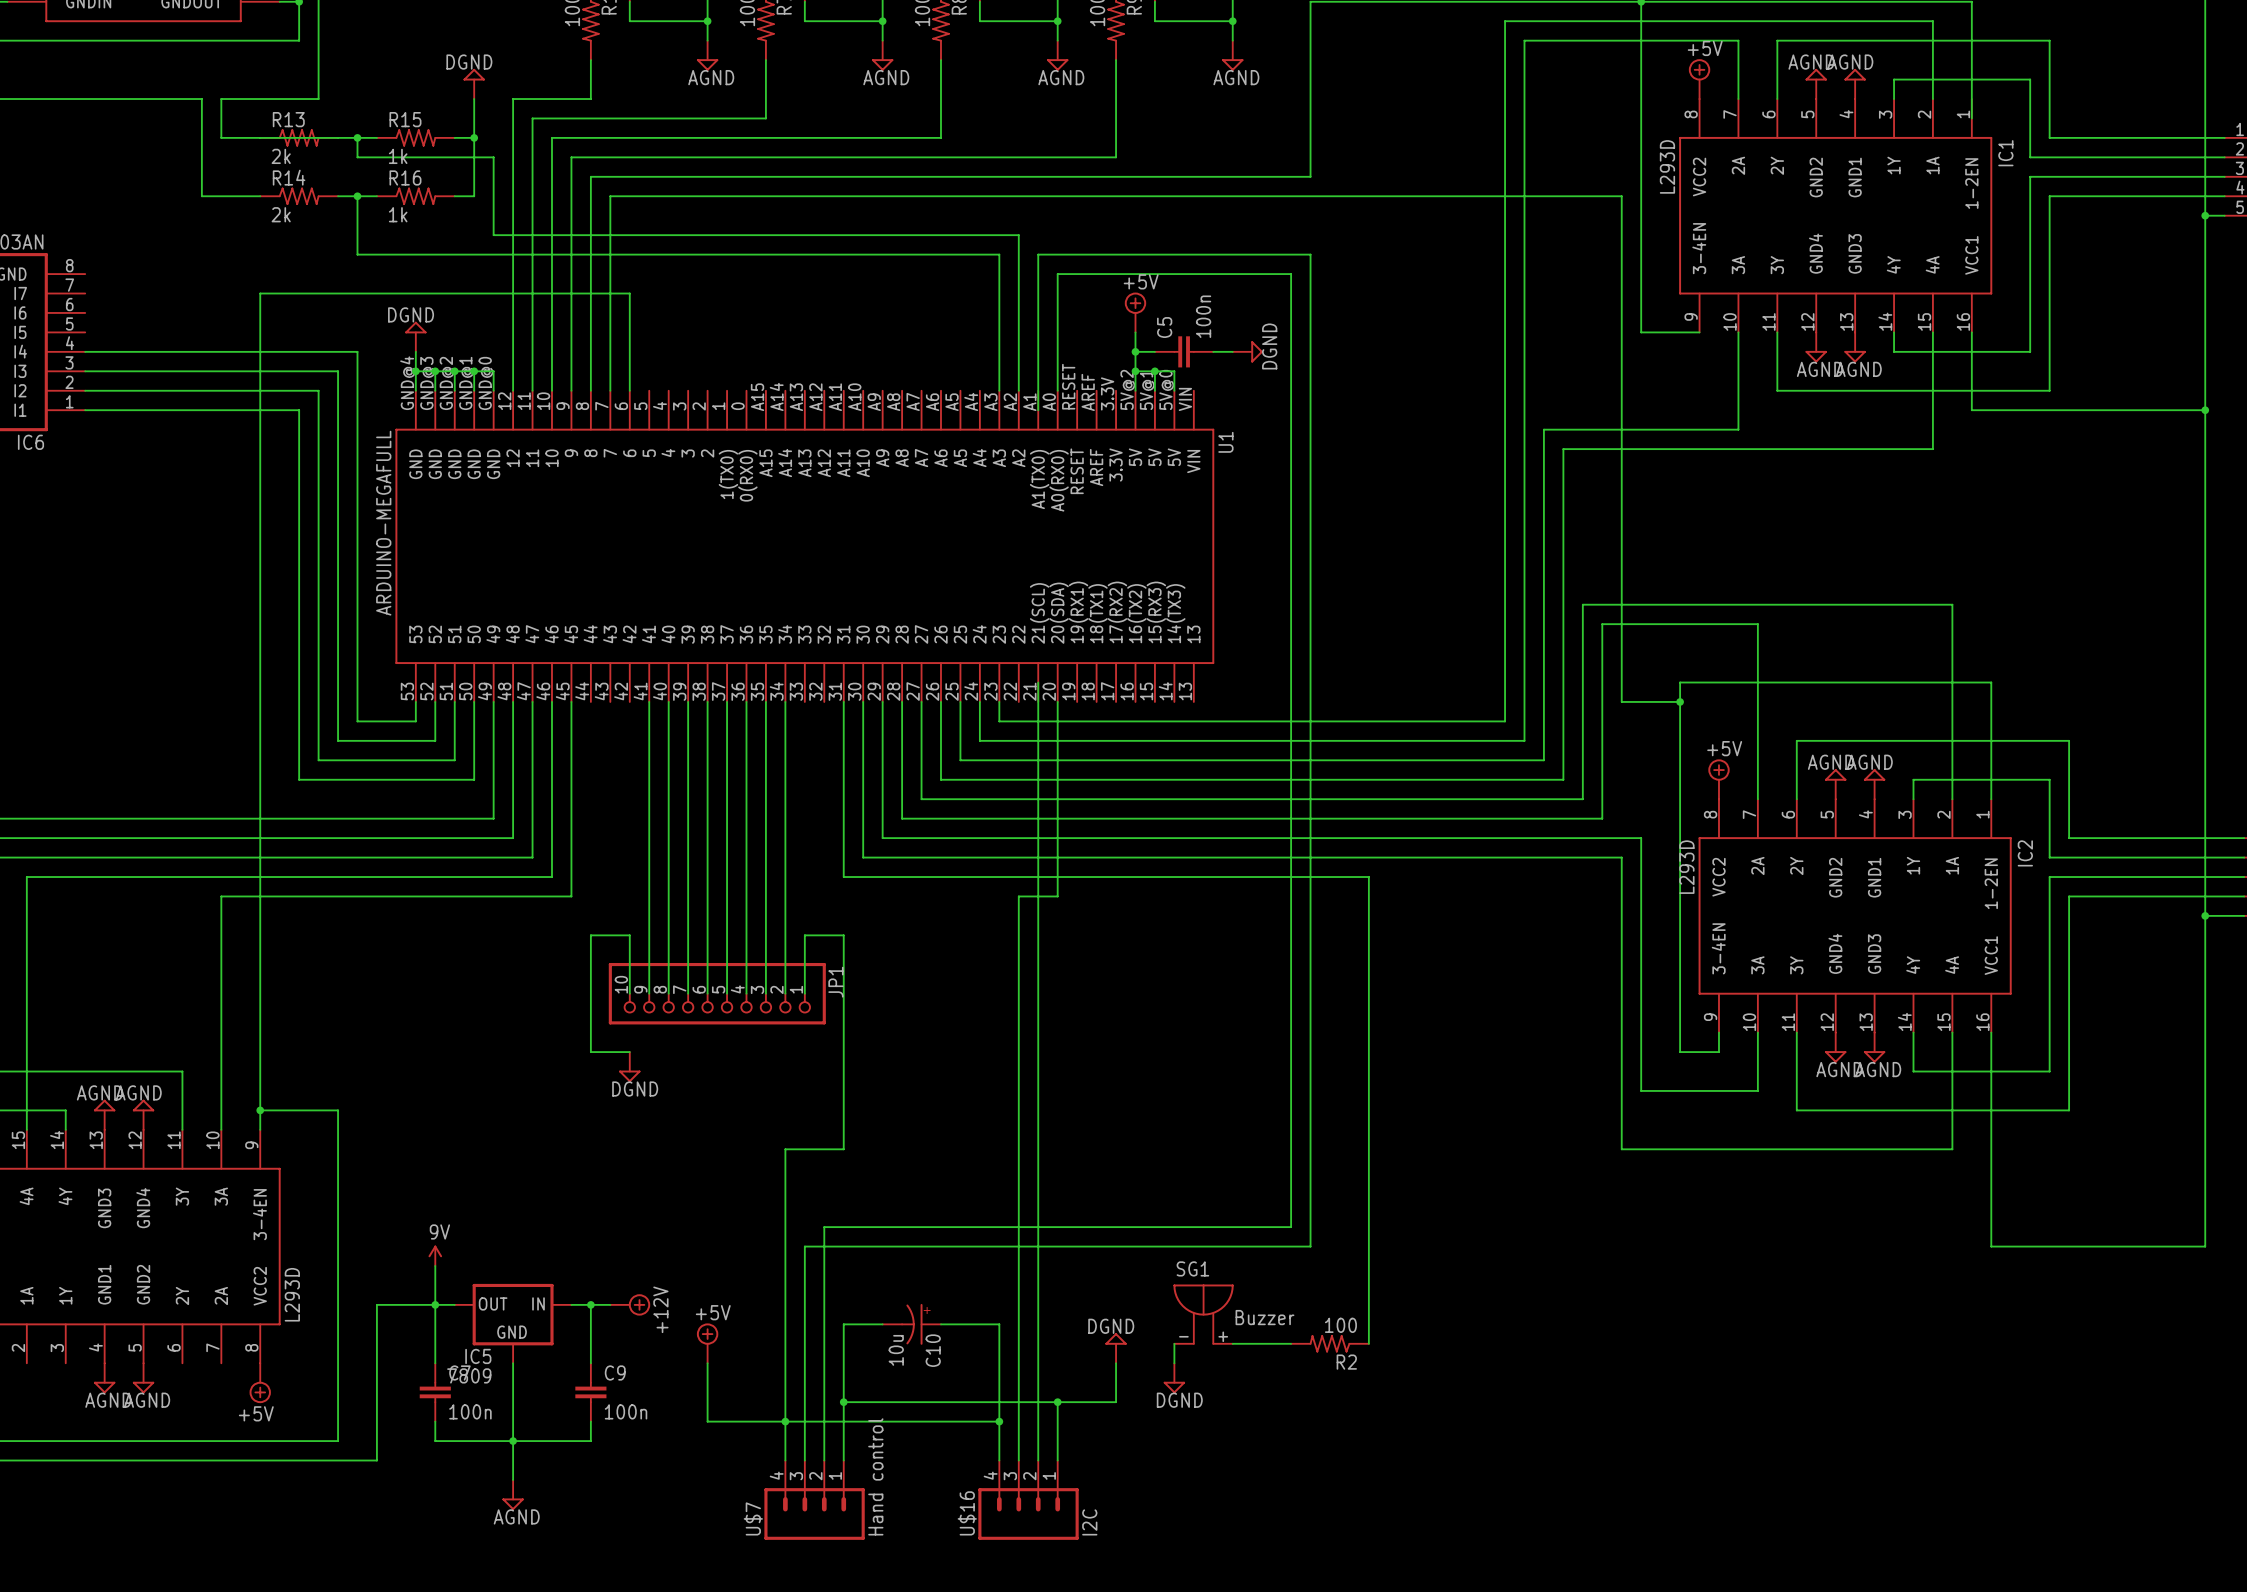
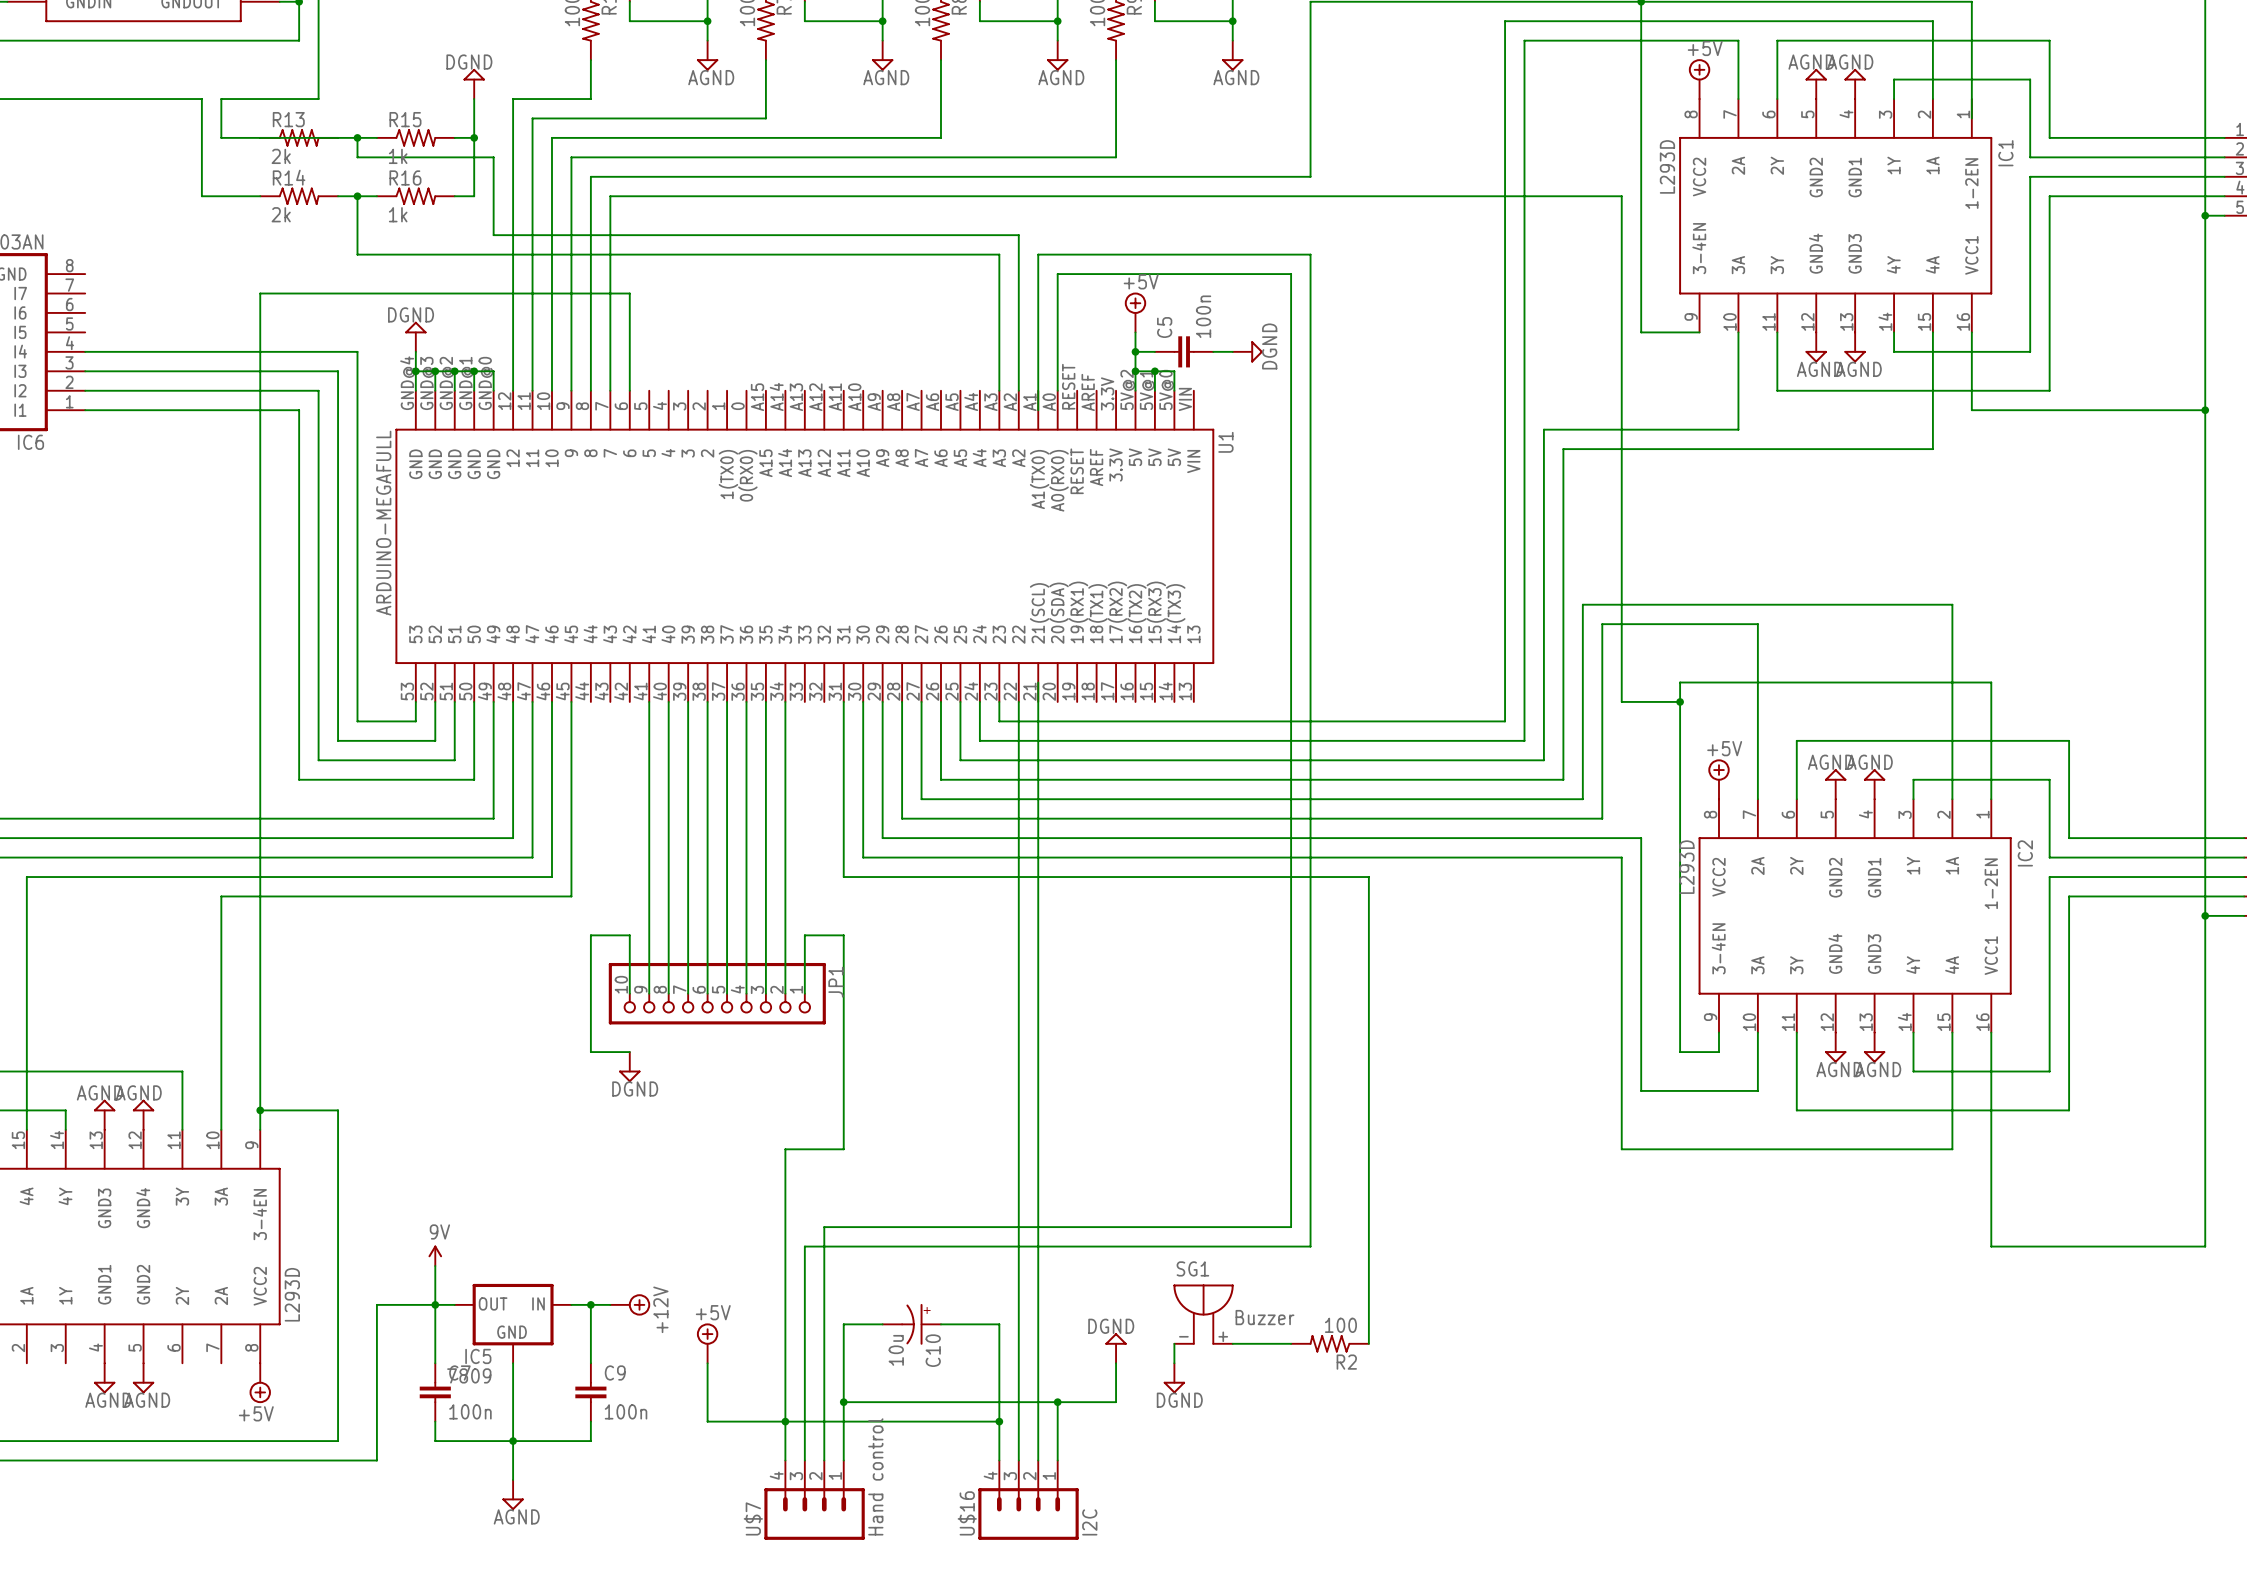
wire: (1057, 701) (1057, 896) (1018, 896) -> (1018, 701) (1018, 896)

